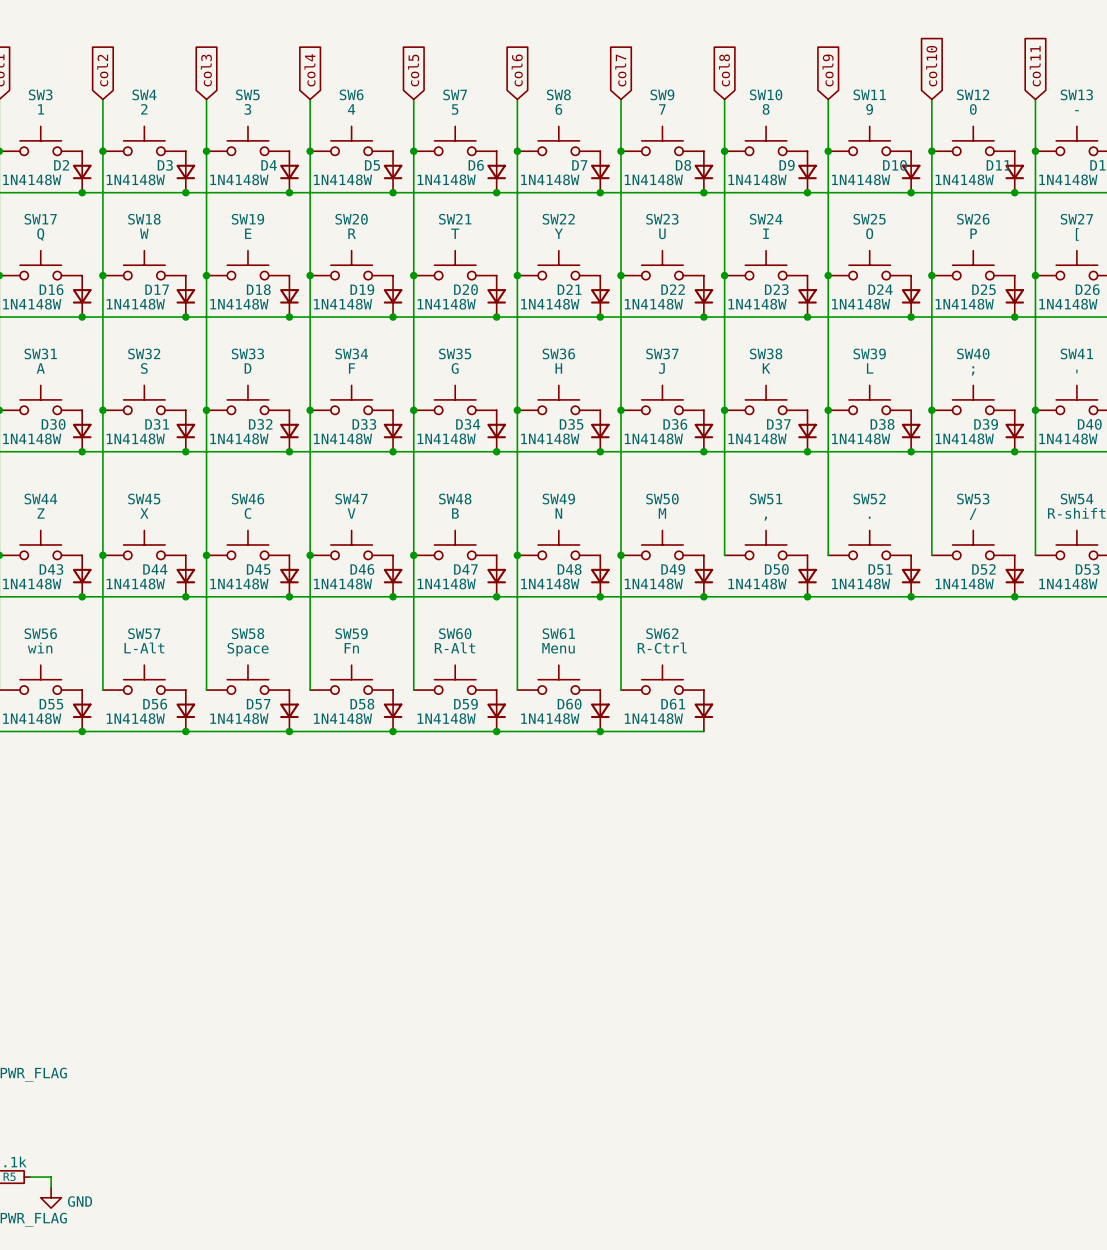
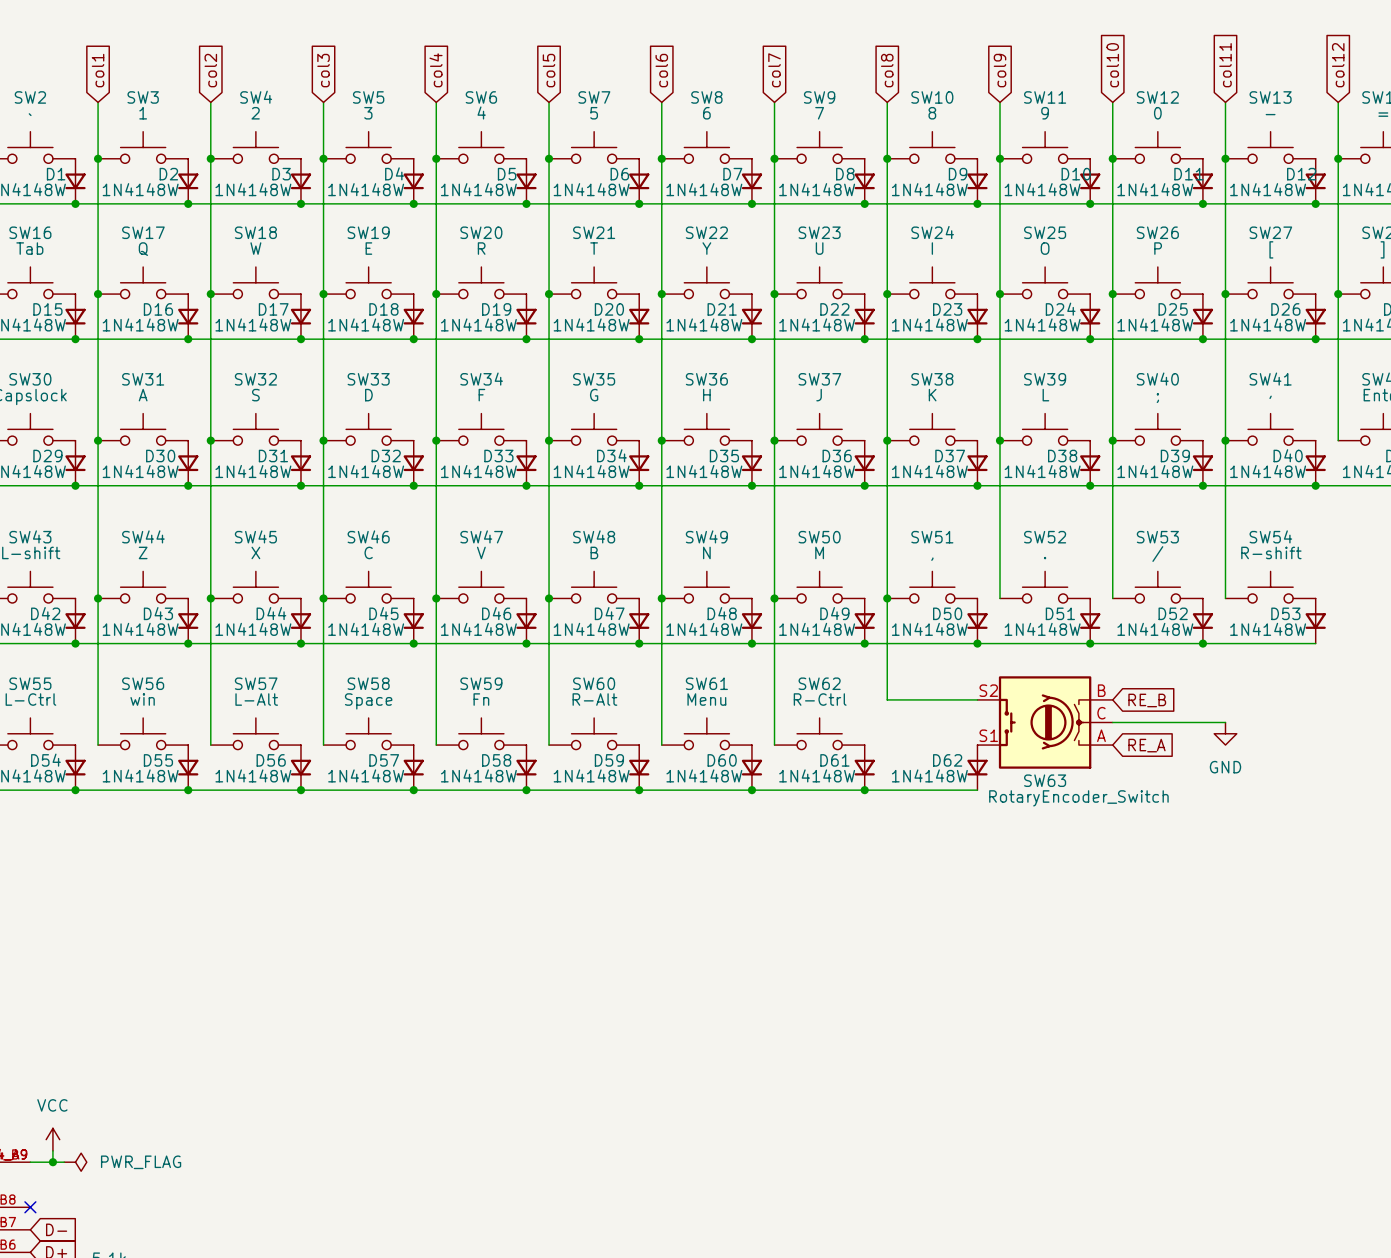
wire: none -> (887, 598) (887, 699) (977, 699)
junction: none -> (887, 598)
global label: none -> RE_B (1147, 700)
SW63: none -> RotaryEncoder_Switch (1045, 722)
wire: none -> (1112, 722) (1225, 722)
power symbol: none -> GND (1225, 733)
global label: none -> RE_A (1146, 745)
D62: none -> 1N4148W (977, 767)
wire: none -> (864, 790) (977, 790)
junction: none -> (864, 790)

